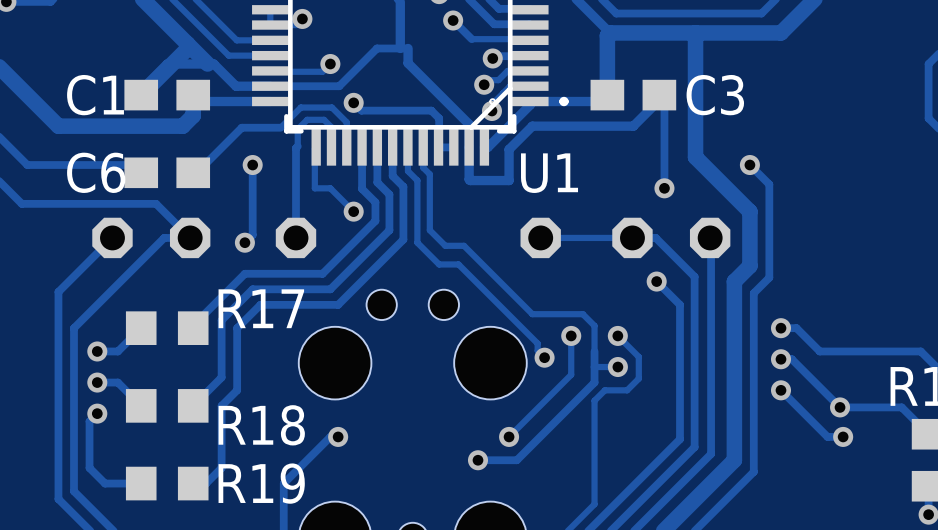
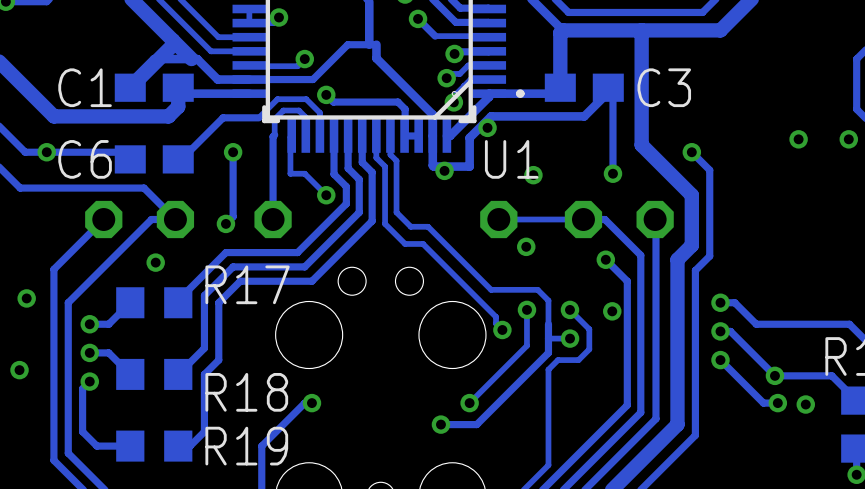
via: none -> (487, 127)
via: none -> (798, 139)
via: none -> (848, 139)
via: none -> (46, 152)
via: none -> (444, 170)
via: none -> (533, 175)
via: none -> (526, 246)
via: none -> (155, 262)
via: none -> (26, 298)
via: none -> (612, 311)
via: none -> (19, 370)
via: none -> (805, 404)

